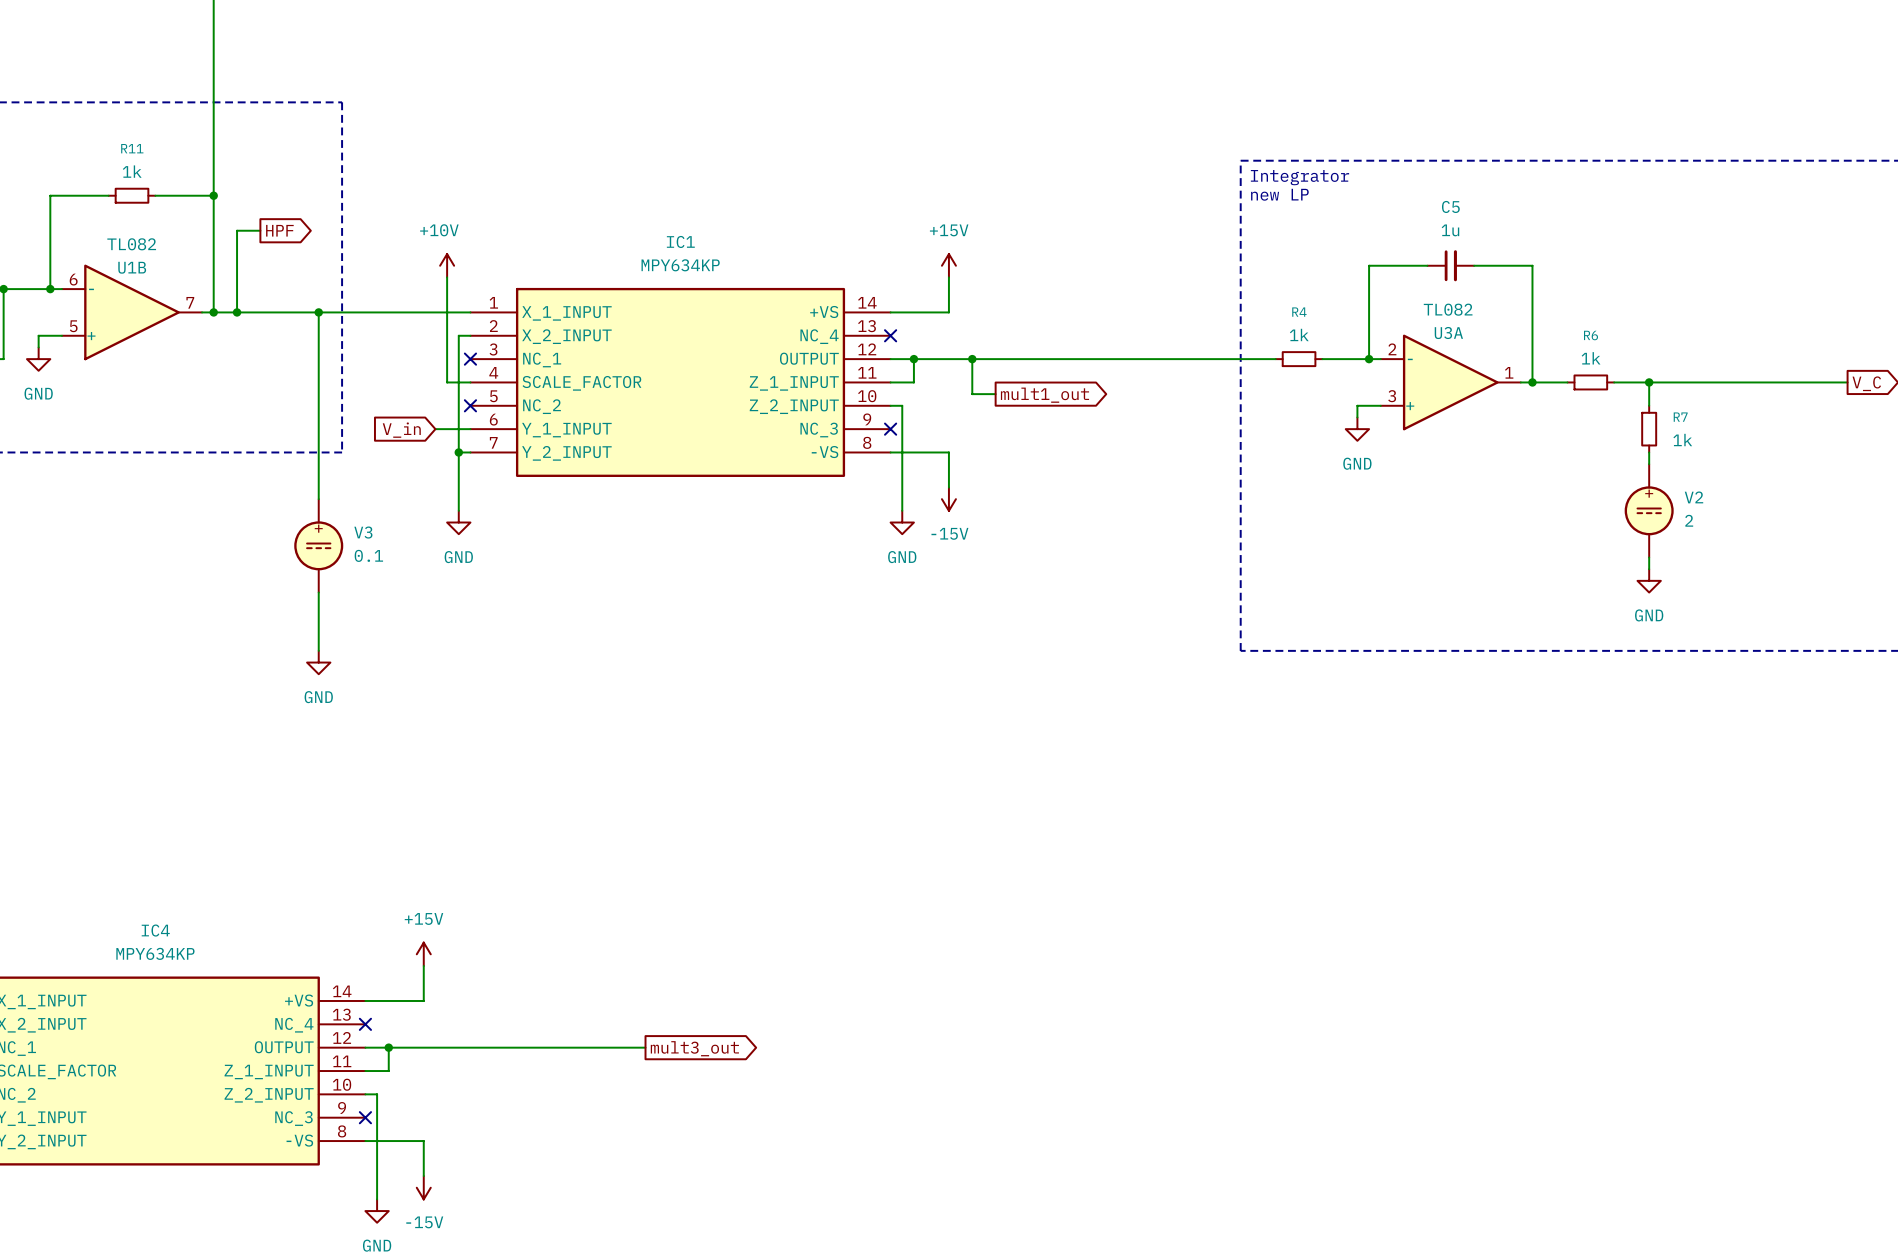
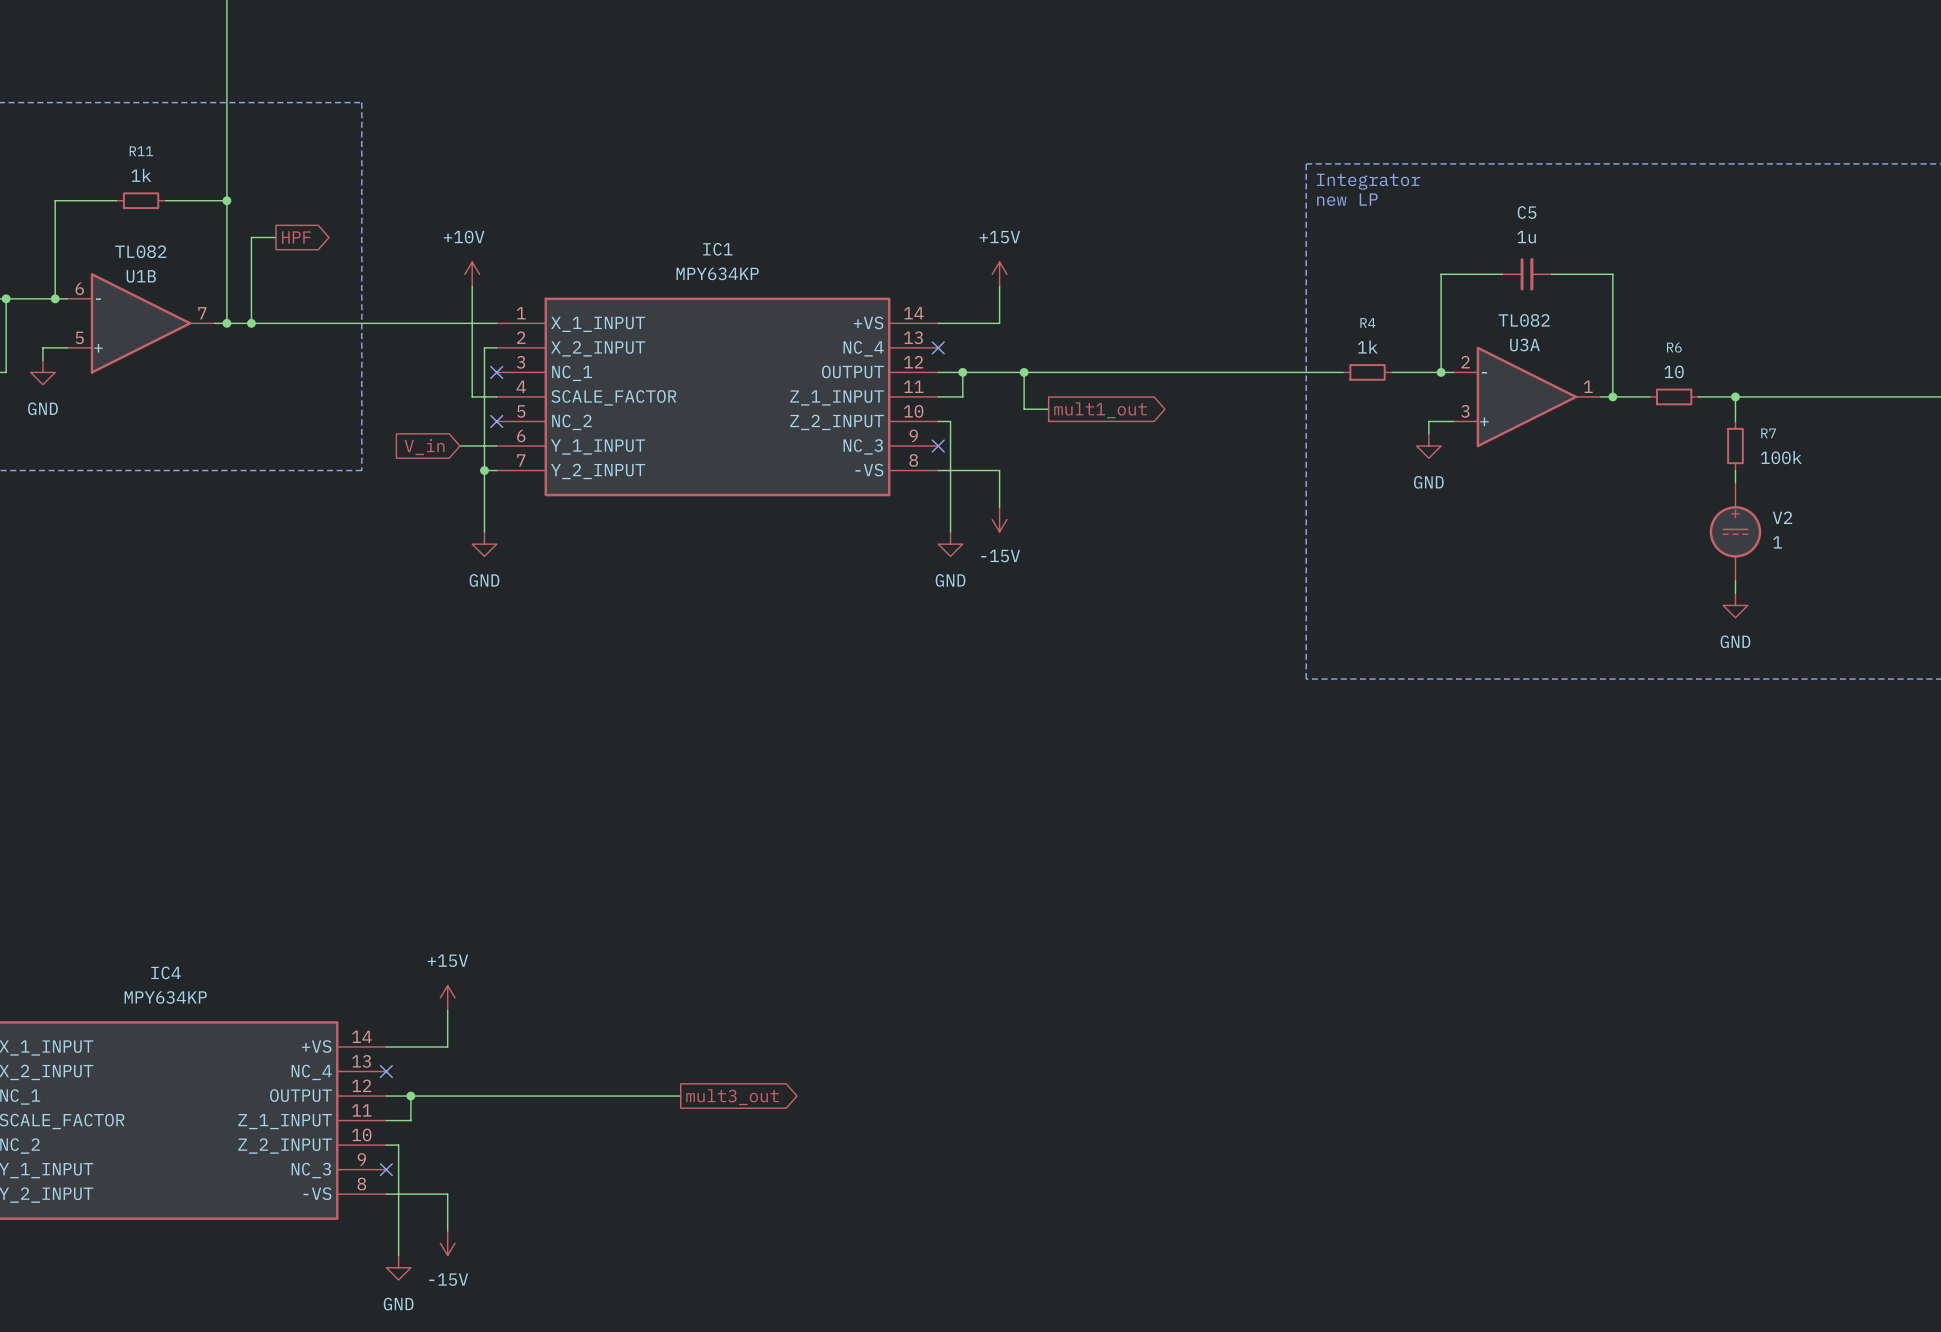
wire: (318, 312) (318, 499) -> none
junction: (318, 312) -> none
R6 value: 1k (1591, 358) -> 10 (1674, 371)
R7 value: 1k (1682, 440) -> 100k (1781, 457)
V2 value: 2 (1689, 520) -> 1 (1777, 542)
V3: 0.1 (318, 545) -> none
wire: (318, 592) (318, 650) -> none
power symbol: GND (318, 662) -> none

